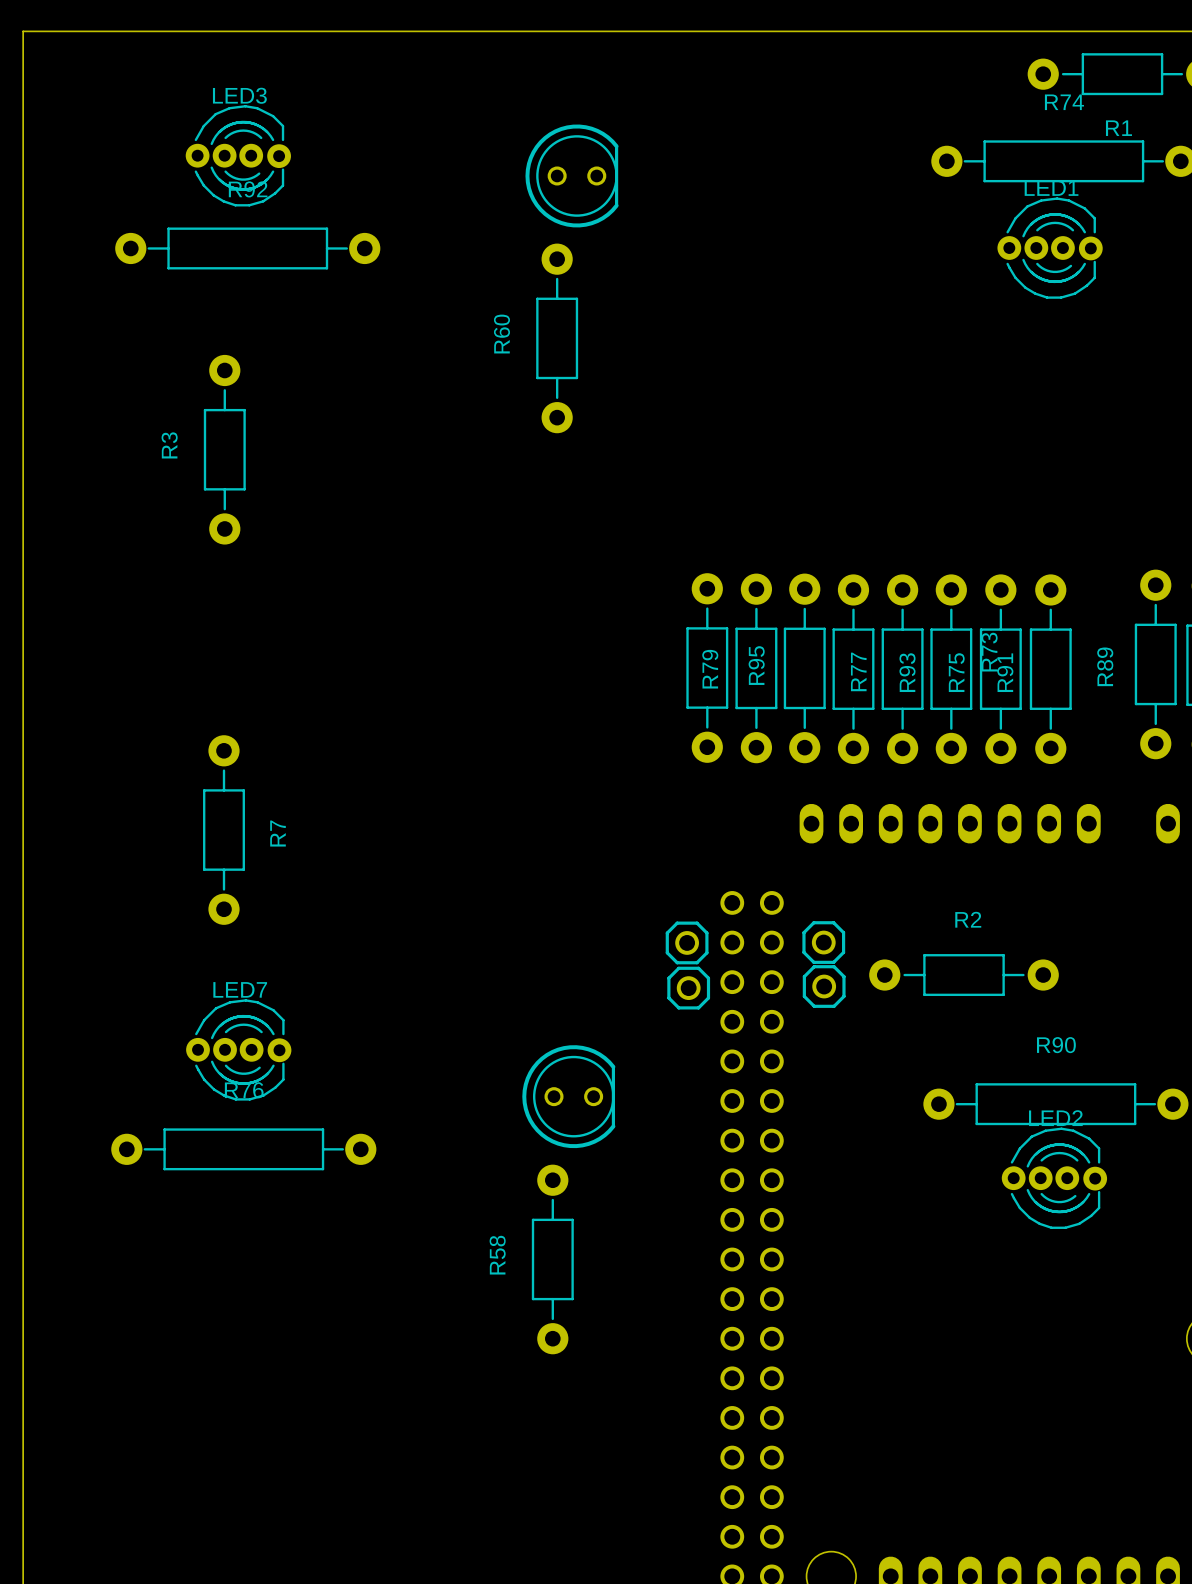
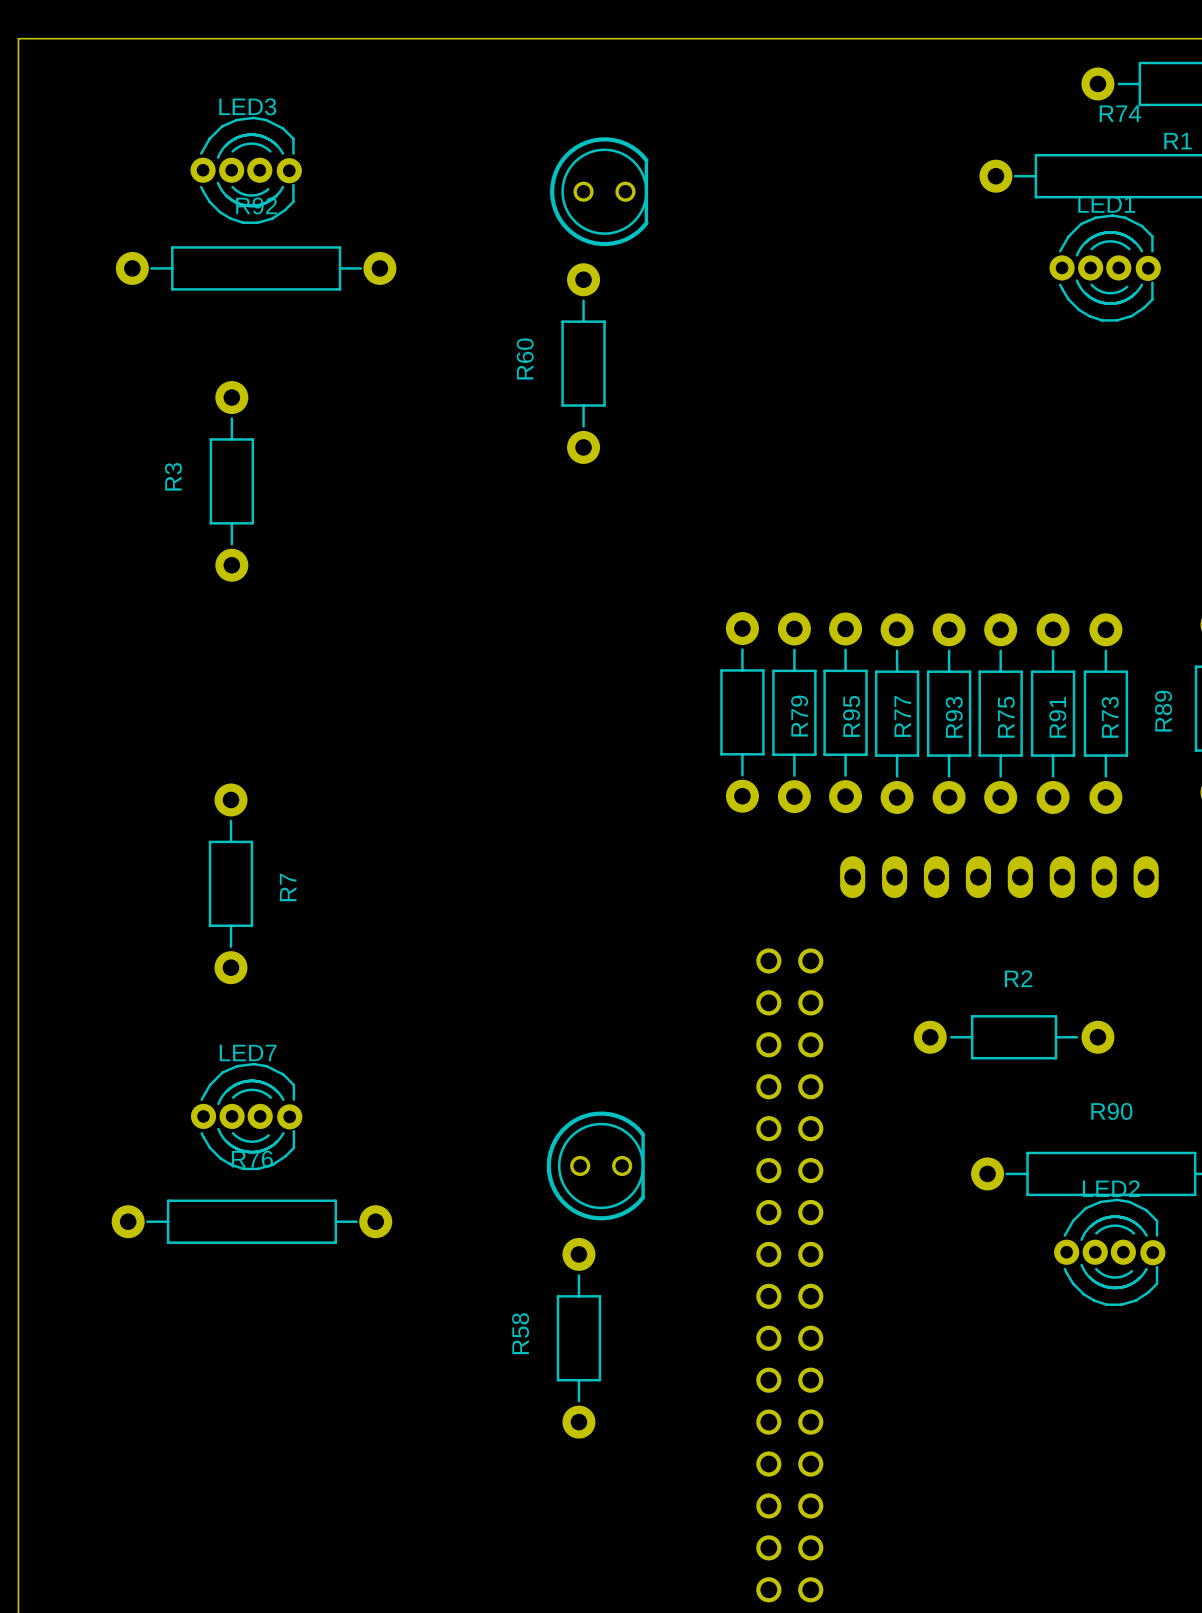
R73 name position: R73 (989, 652) -> R73 (1110, 717)
R95 name position: R95 (756, 665) -> R95 (851, 716)
R79 name position: R79 (710, 669) -> R79 (799, 716)
part: (687, 942) -> none
part: (823, 942) -> none
part: (824, 986) -> none
part: (688, 988) -> none

